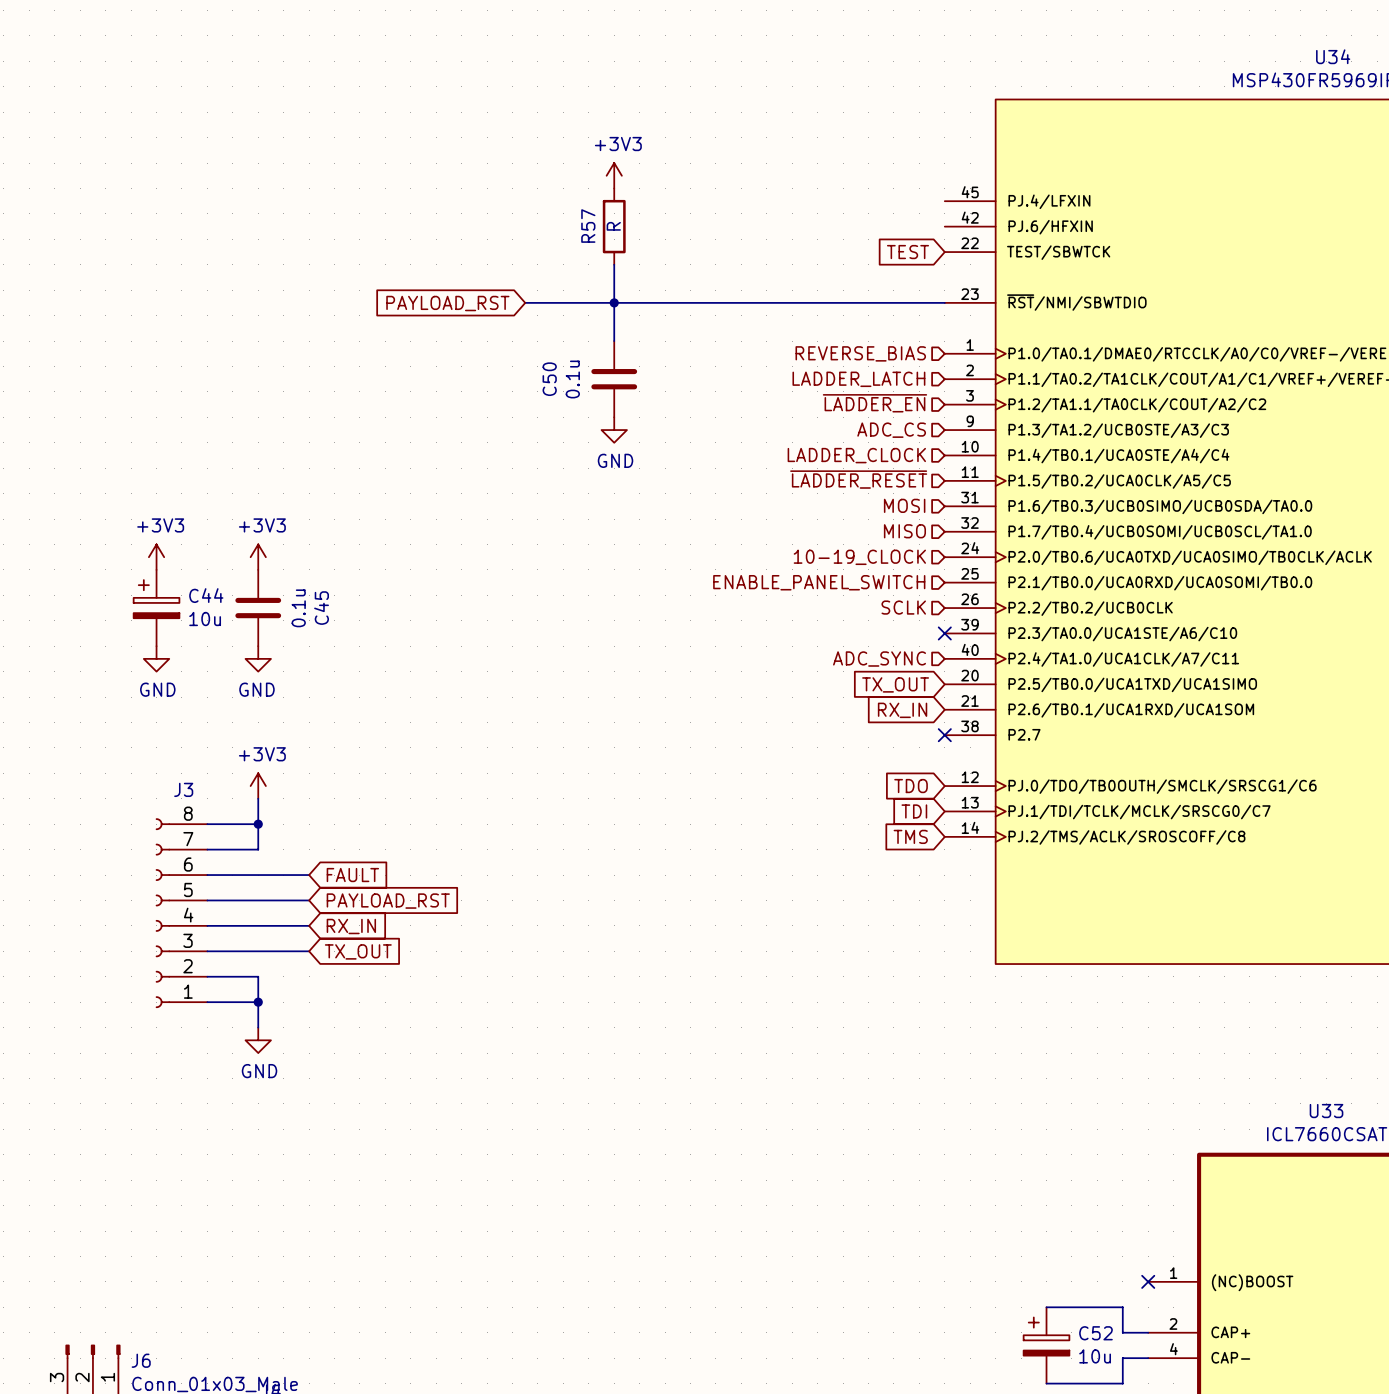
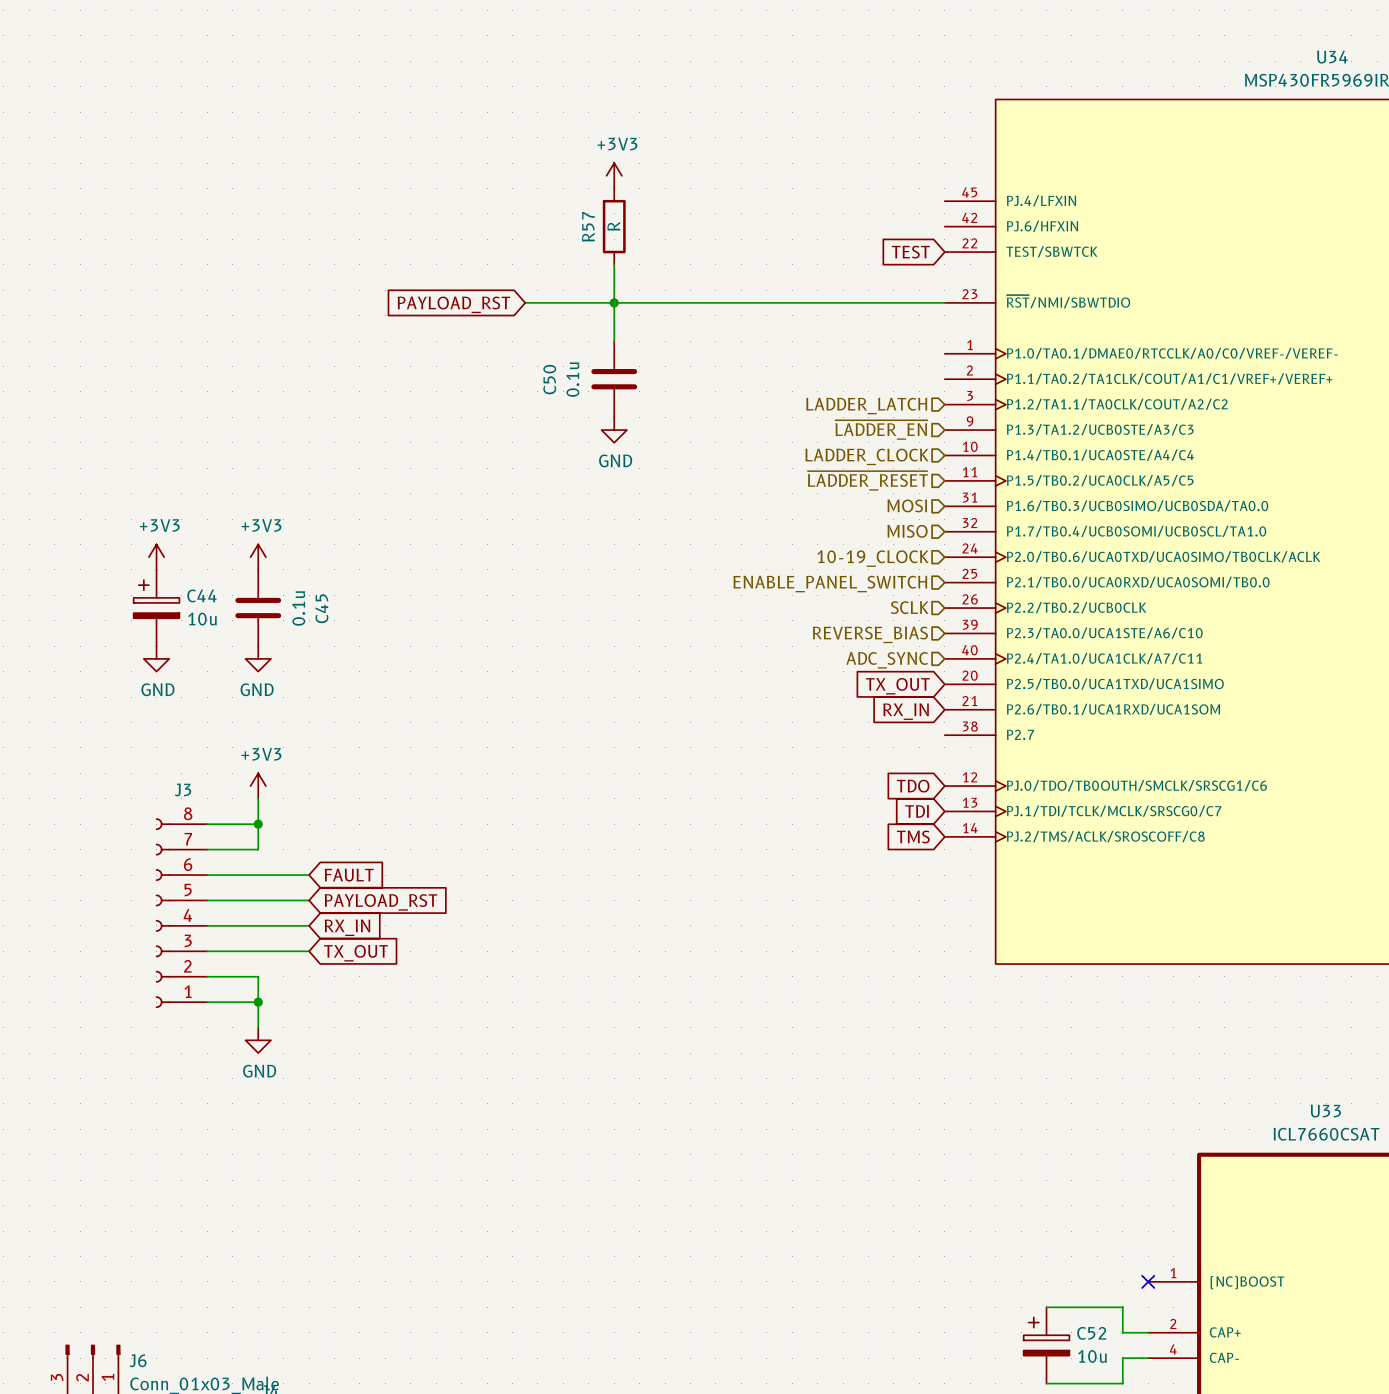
hierarchical label: REVERSE_BIAS (860, 353) -> none
hierarchical label: LADDER_LATCH (858, 379) -> none
hierarchical label: ~{LADDER_EN} (874, 403) -> LADDER_LATCH (866, 406)
hierarchical label: ADC_CS (891, 430) -> ~{LADDER_EN} (881, 430)
hierarchical label: none -> REVERSE_BIAS (870, 634)
no-connect mark: (944, 633) -> none
no-connect mark: (944, 735) -> none

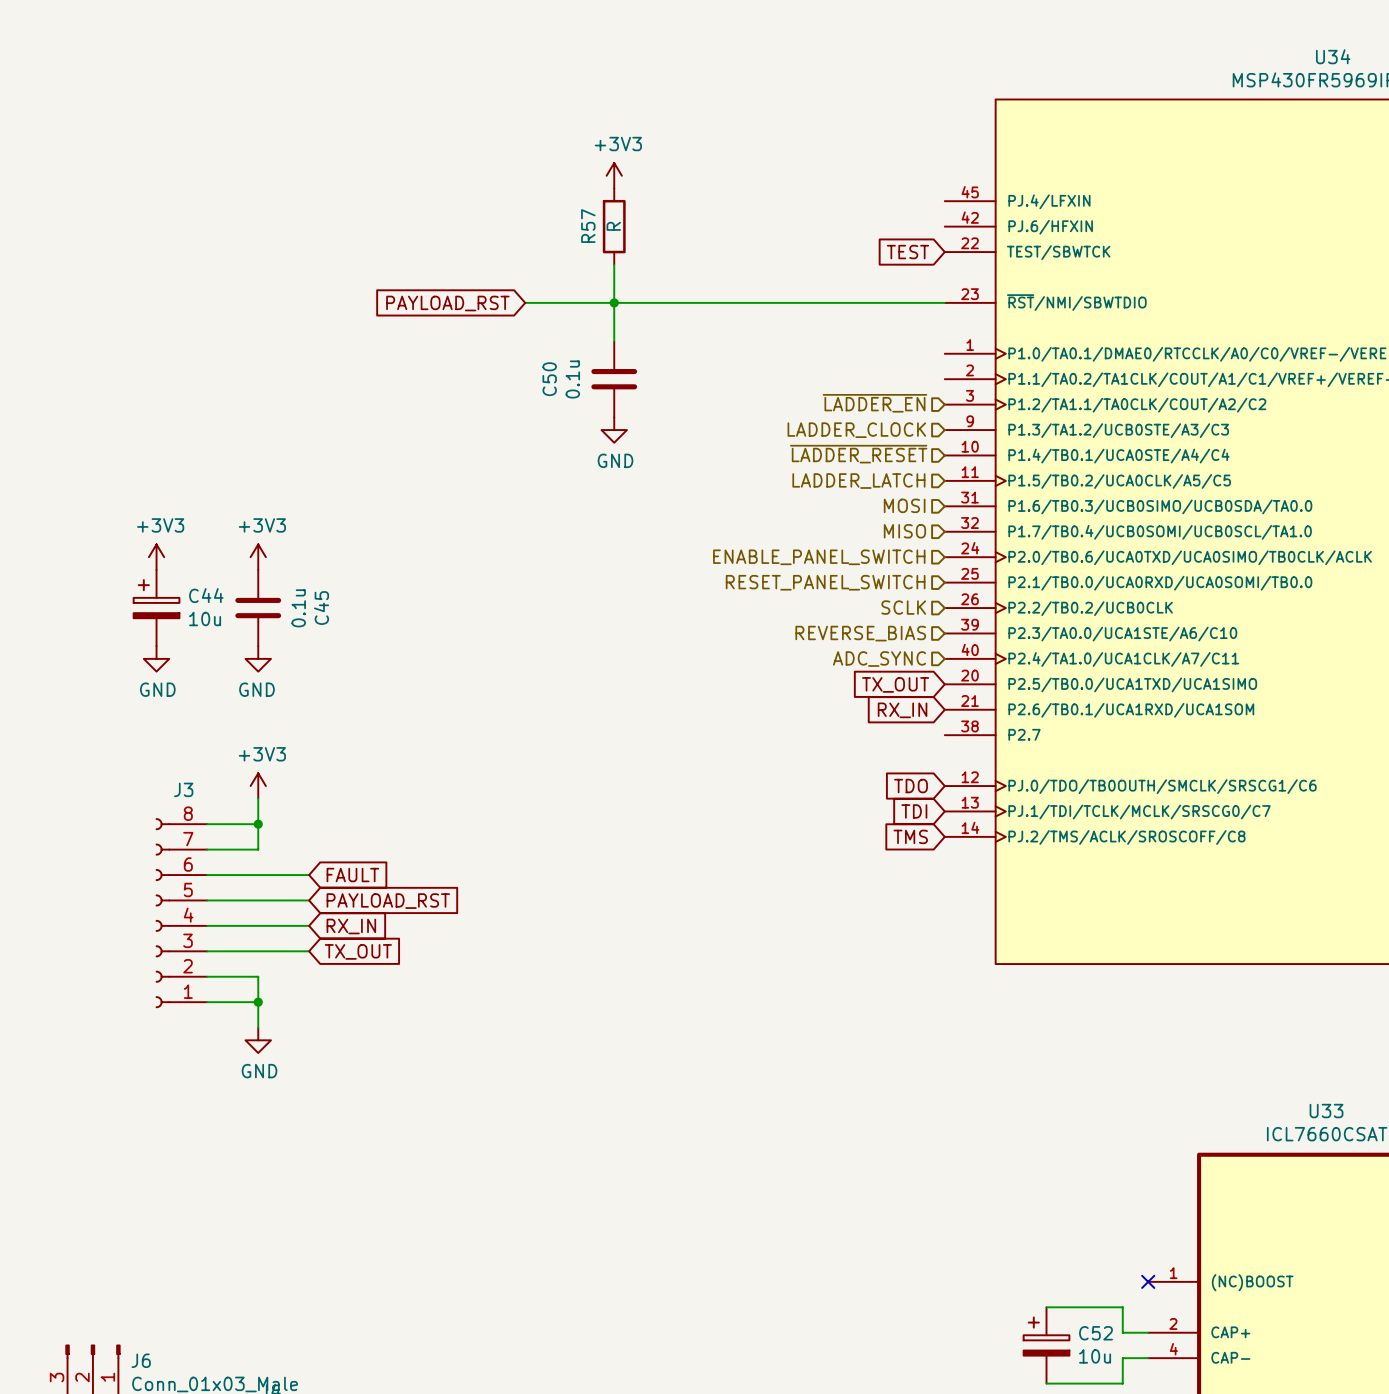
hierarchical label: LADDER_LATCH (866, 406) -> ~{LADDER_EN} (874, 403)
hierarchical label: ~{LADDER_EN} (881, 430) -> LADDER_CLOCK (856, 430)
hierarchical label: LADDER_CLOCK (866, 456) -> ~{LADDER_RESET} (858, 454)
hierarchical label: ~{LADDER_RESET} (867, 480) -> LADDER_LATCH (858, 481)
hierarchical label: 10-19_CLOCK (872, 558) -> ENABLE_PANEL_SWITCH (819, 557)
hierarchical label: ENABLE_PANEL_SWITCH (830, 584) -> RESET_PANEL_SWITCH (825, 582)

